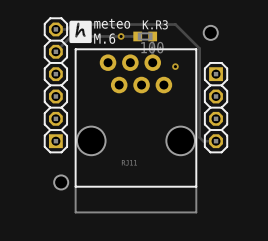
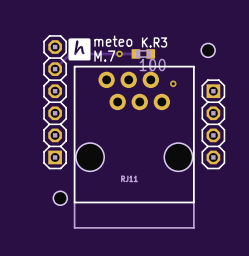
track: (55, 29) (67, 29) (72, 24) (175, 24) (199, 48) (199, 137) (203, 141) (216, 141) -> none
text: M.6 (104, 38) -> M.7 (104, 56)

